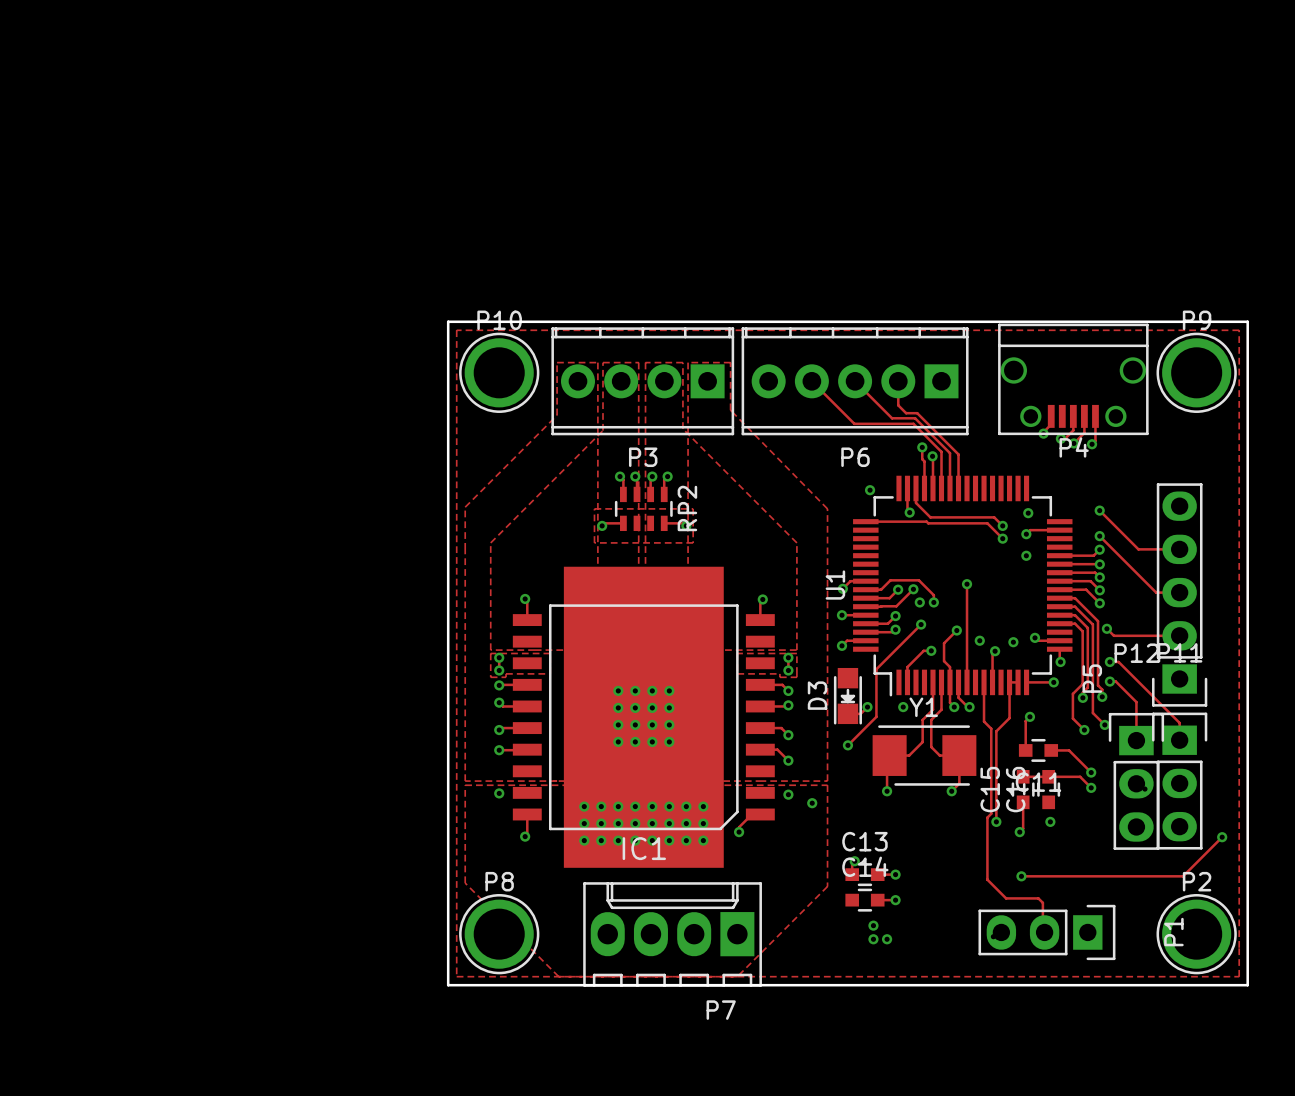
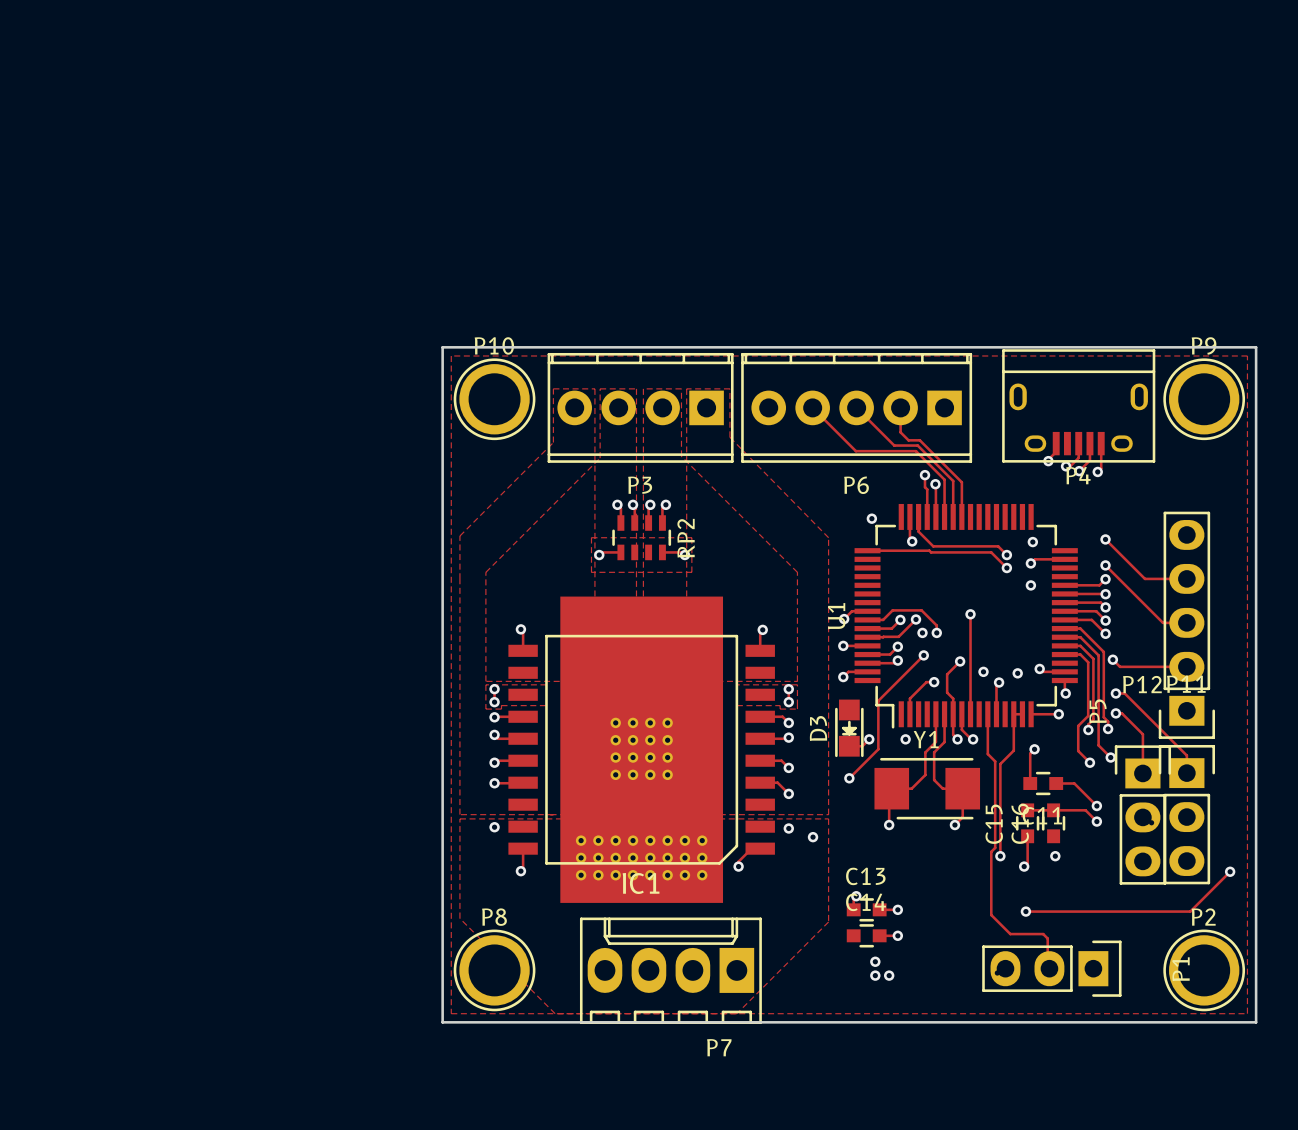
P4 footprint: [998, 323, 1149, 436] -> [1002, 349, 1156, 463]

